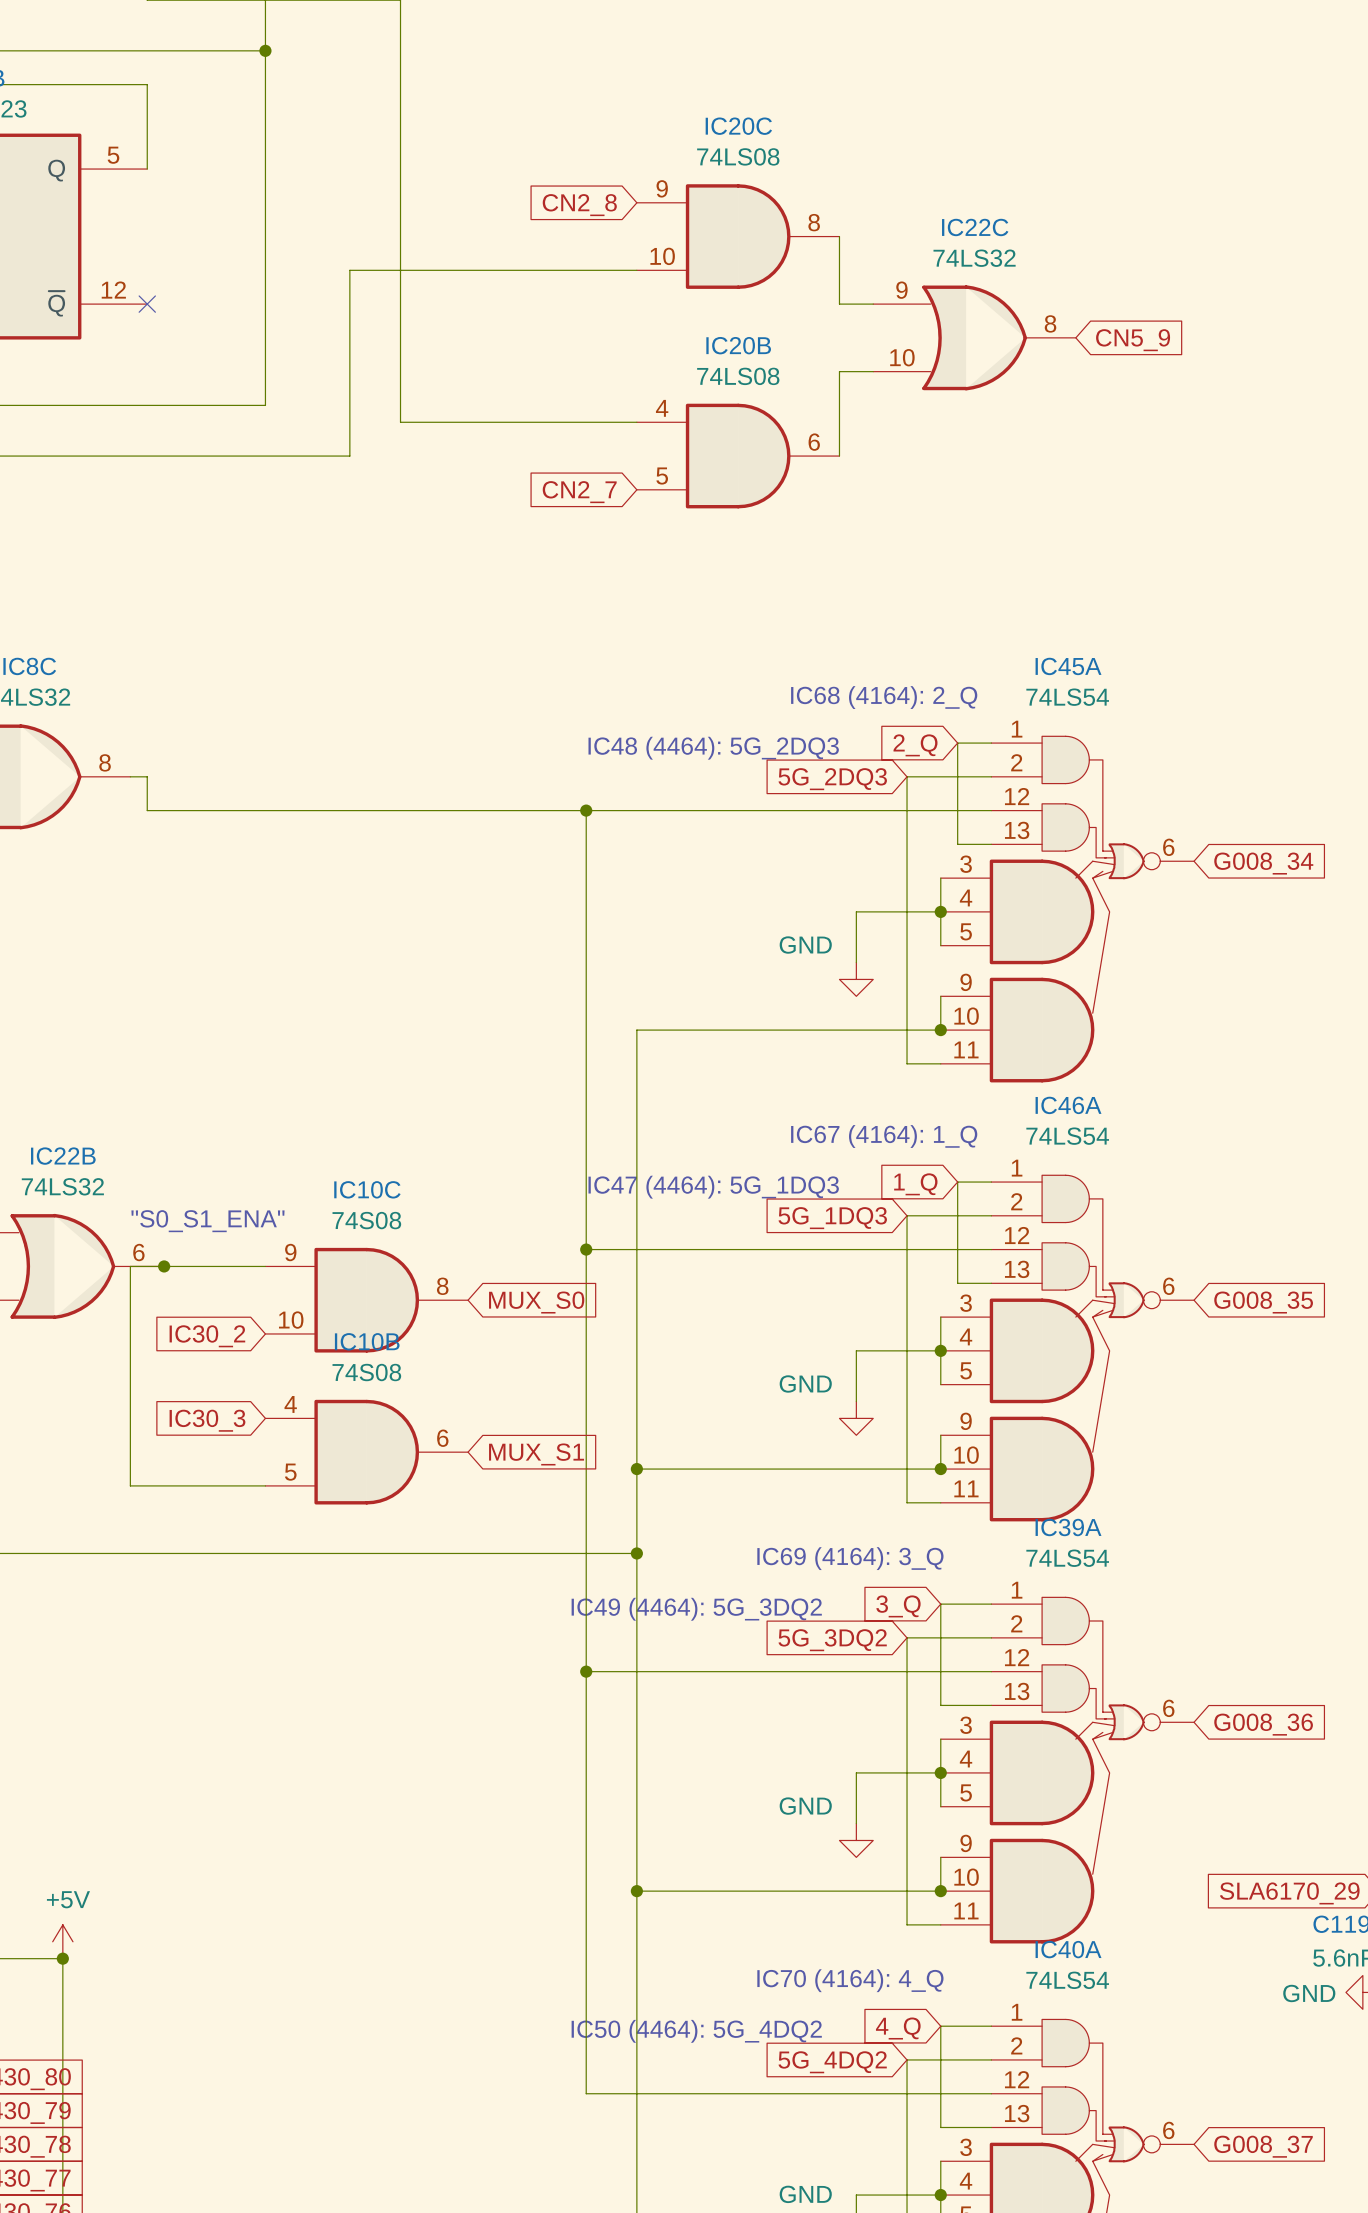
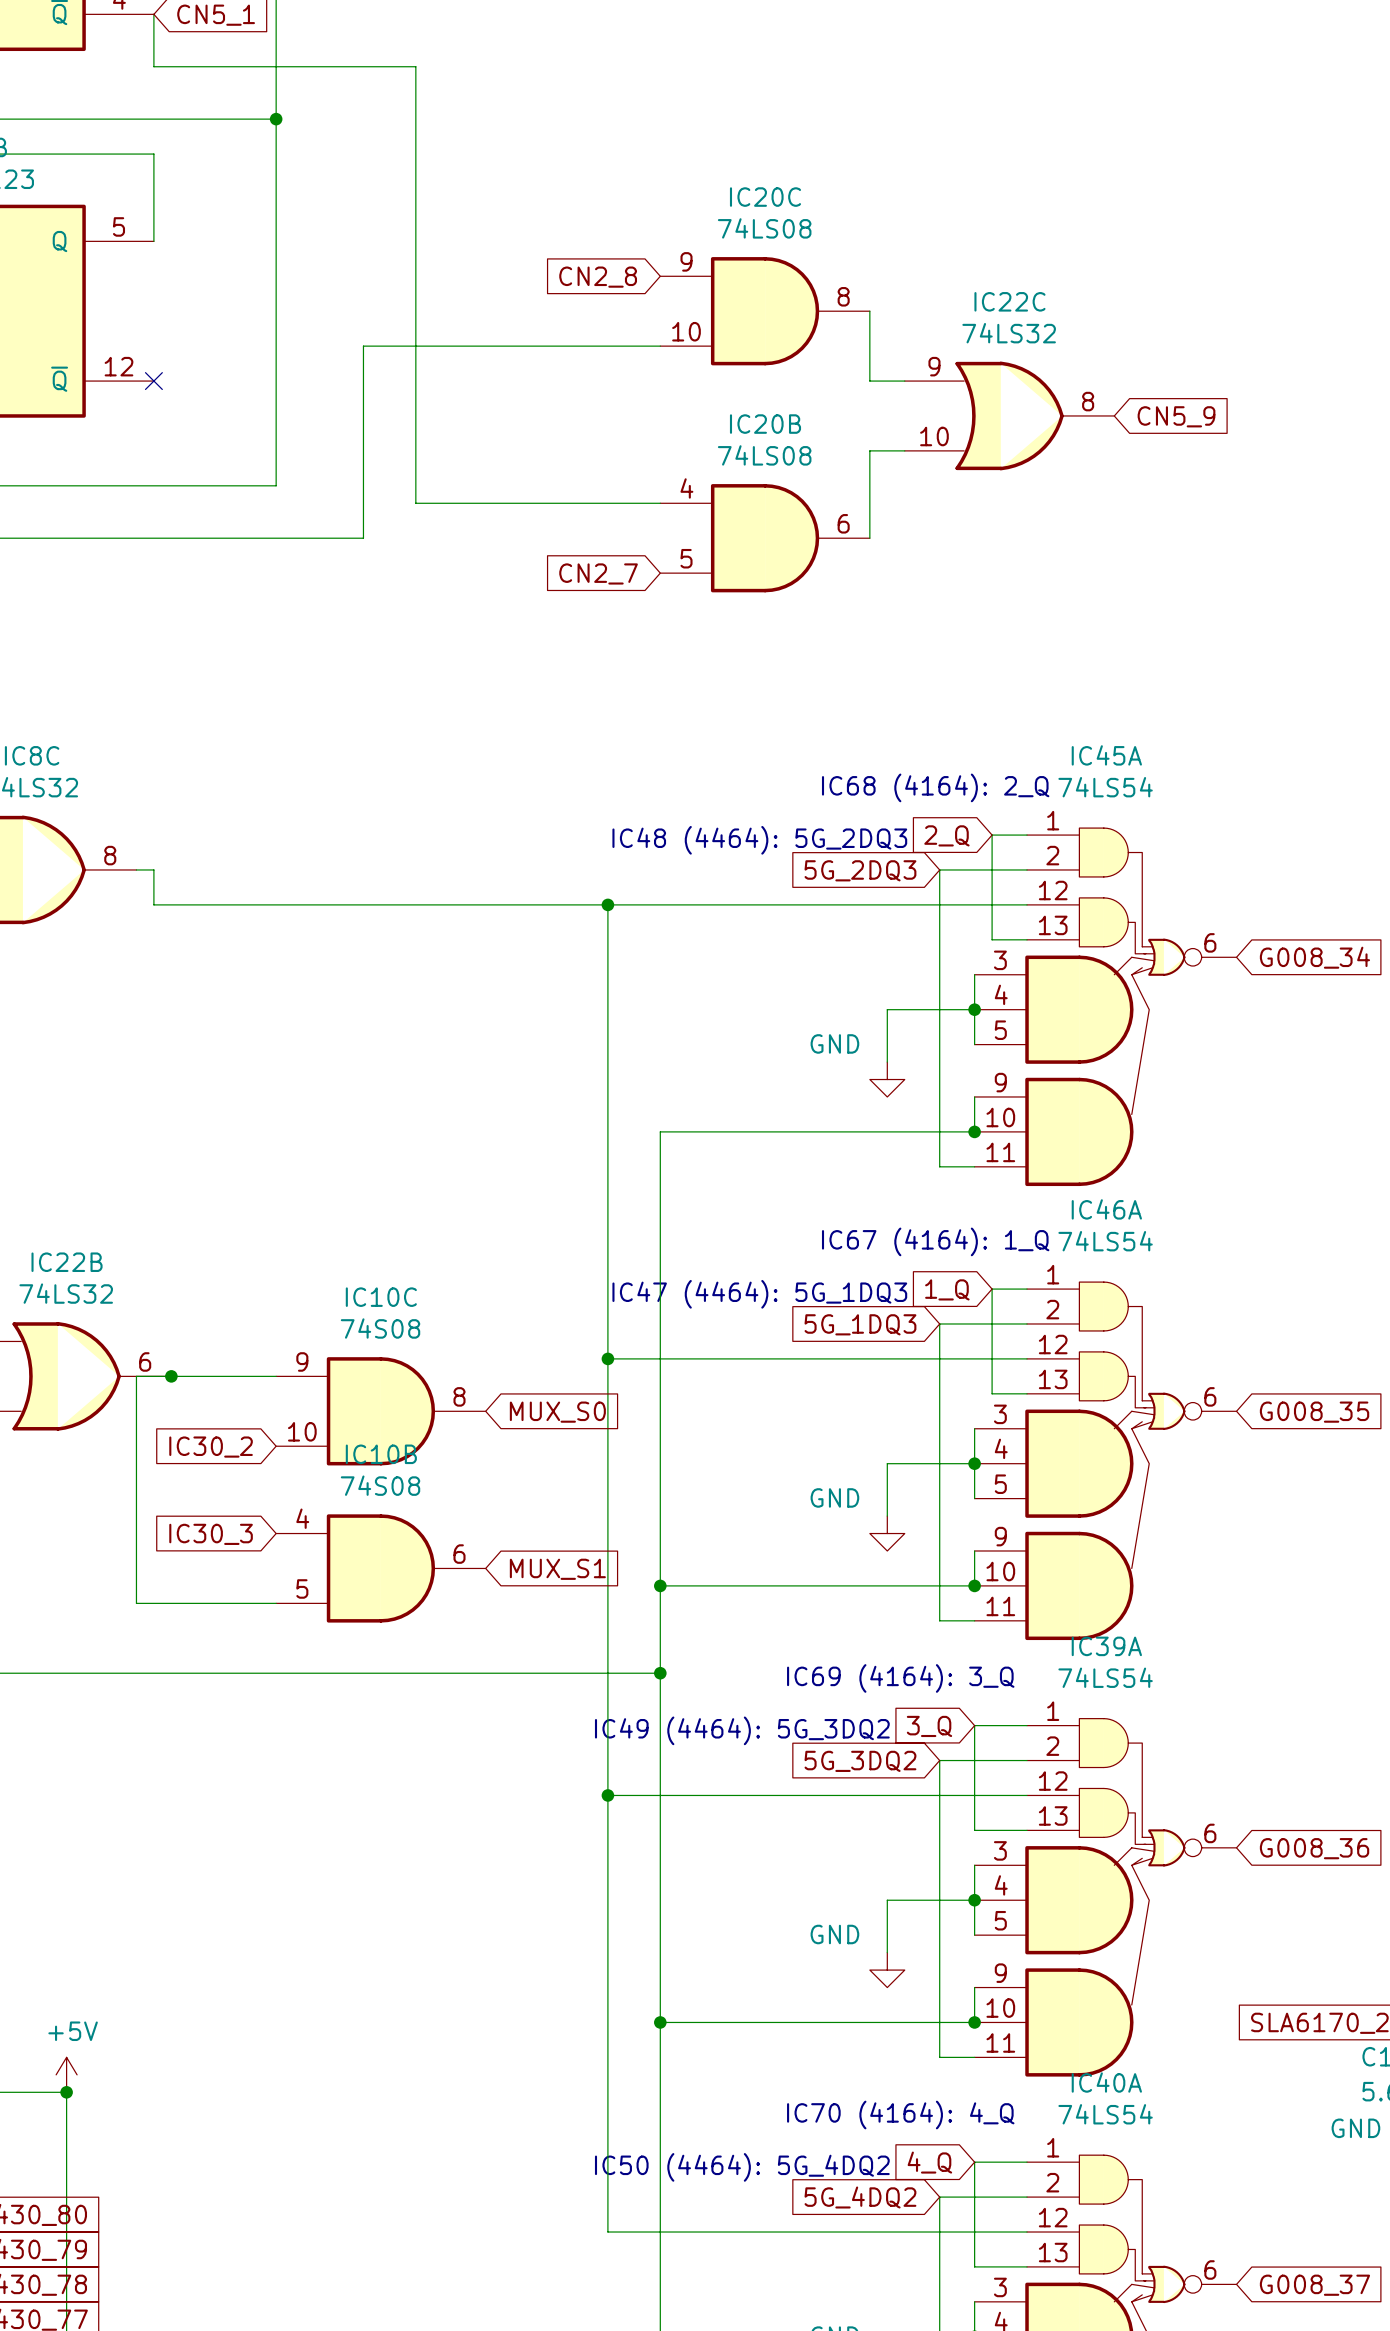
text: "S0_S1_ENA" (207, 1221) -> none

